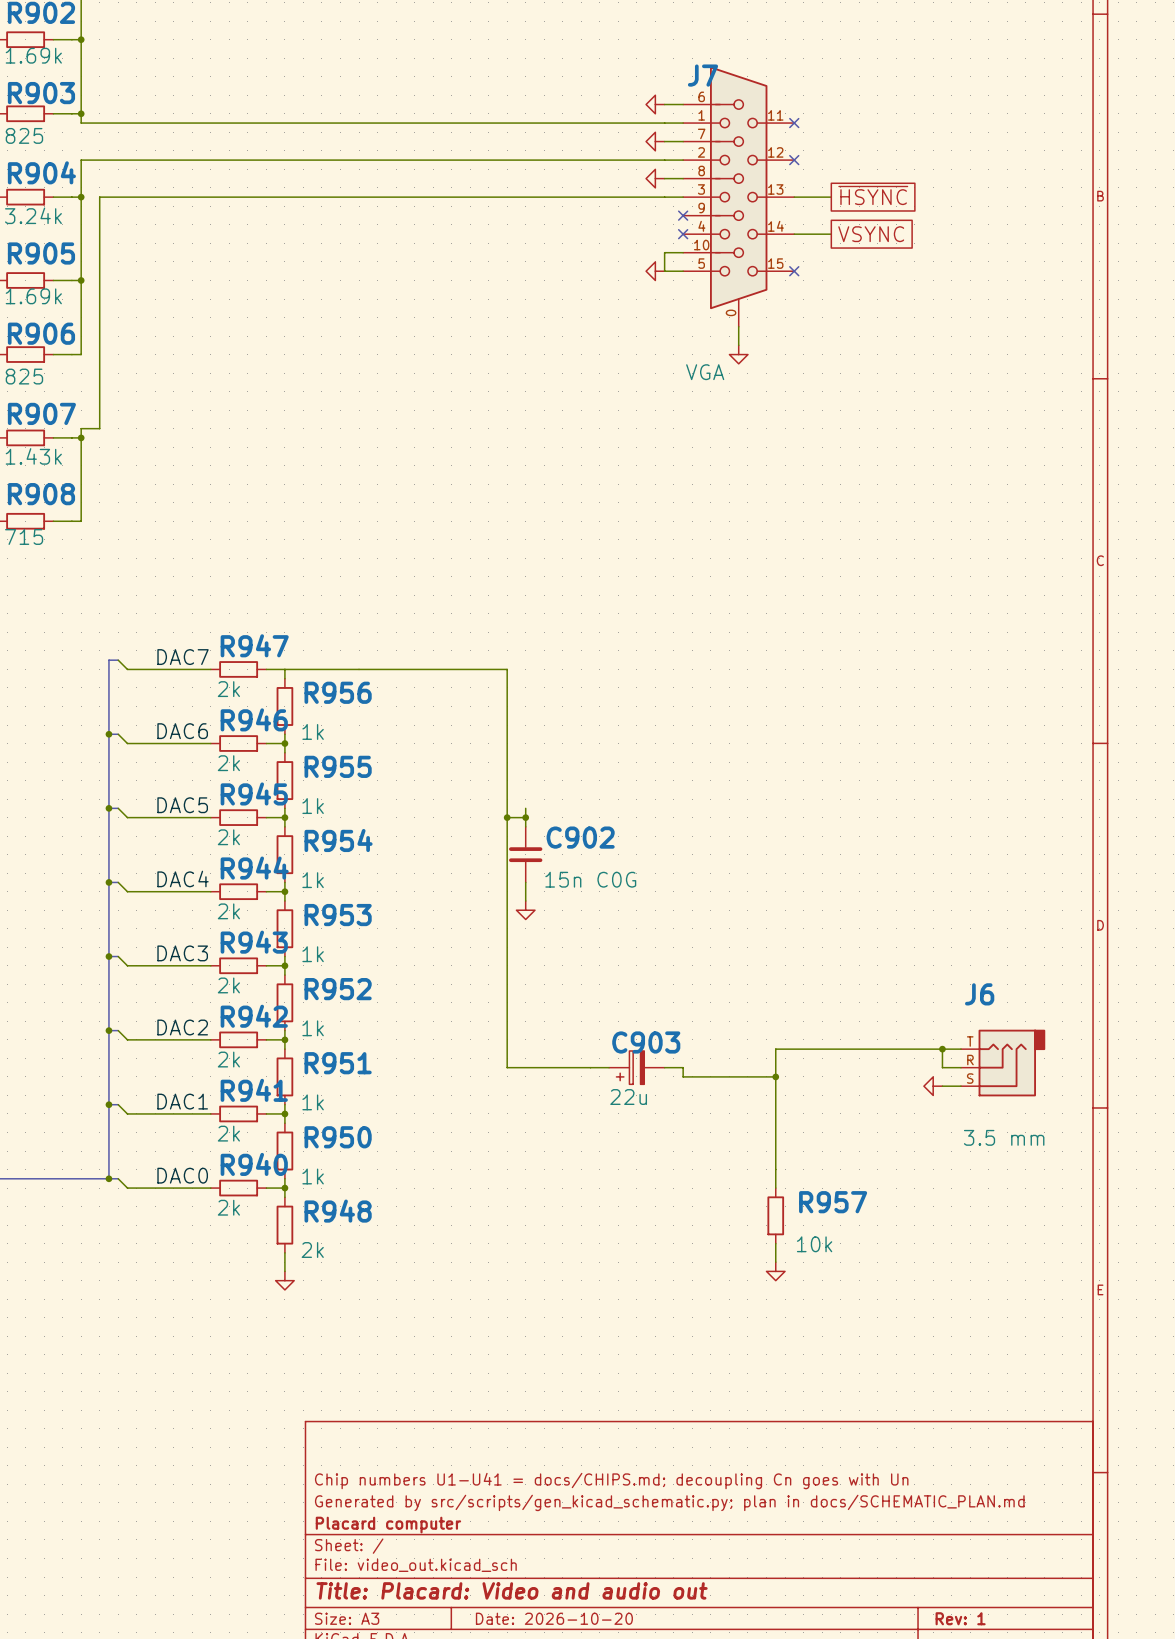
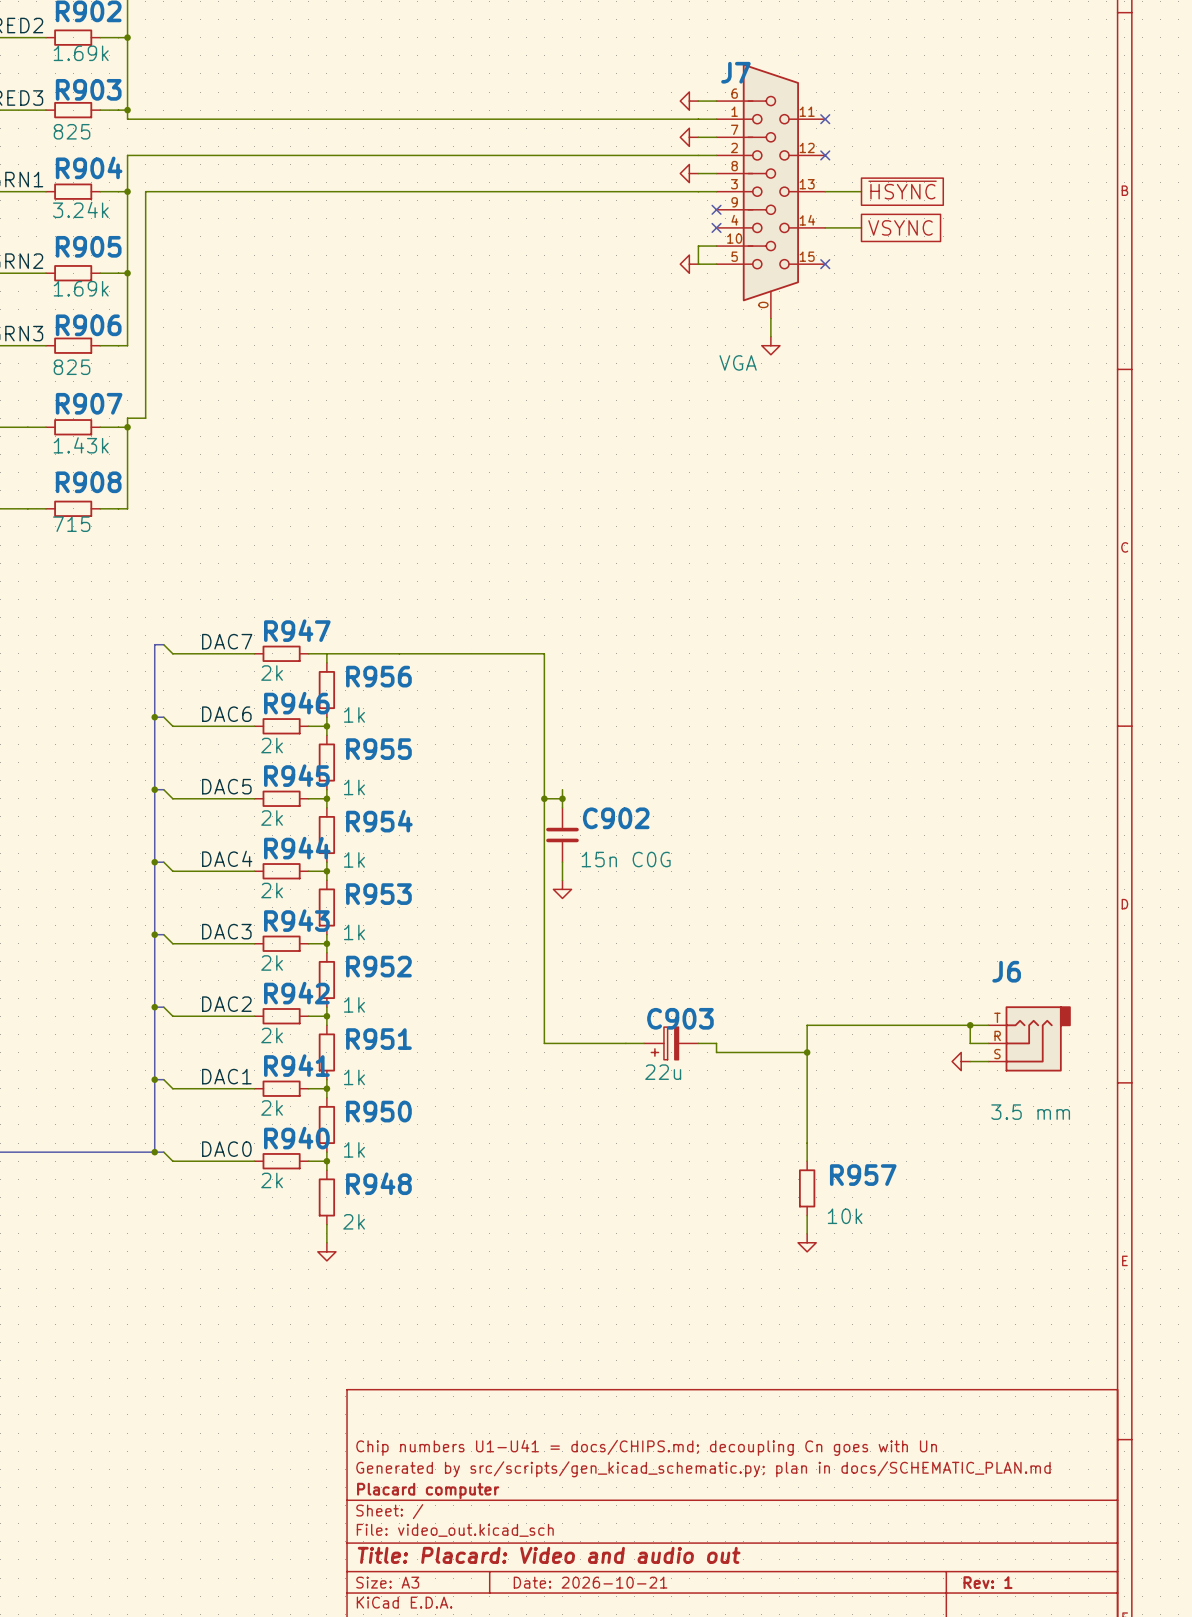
title block: Date: 2026-10-20 (554, 1618) -> Date: 2026-10-21 (590, 1582)

